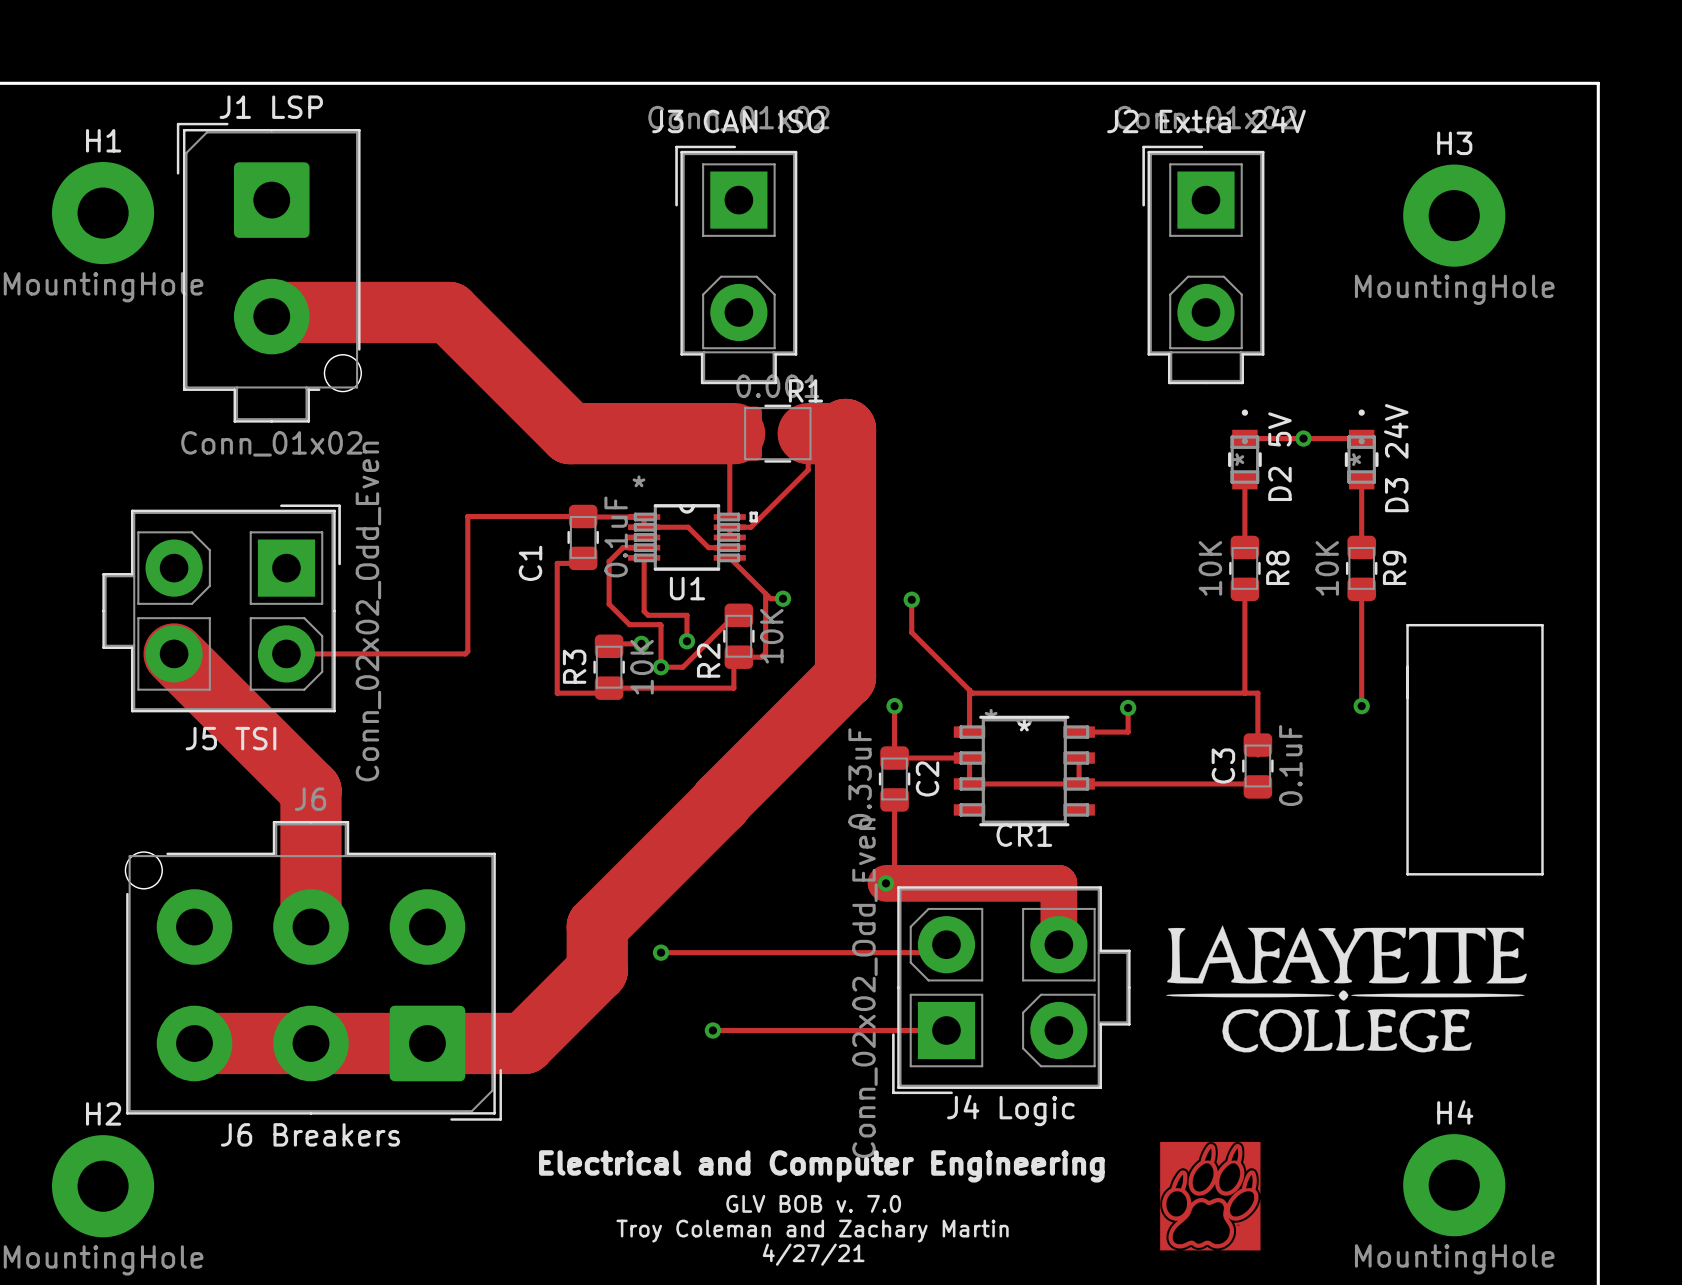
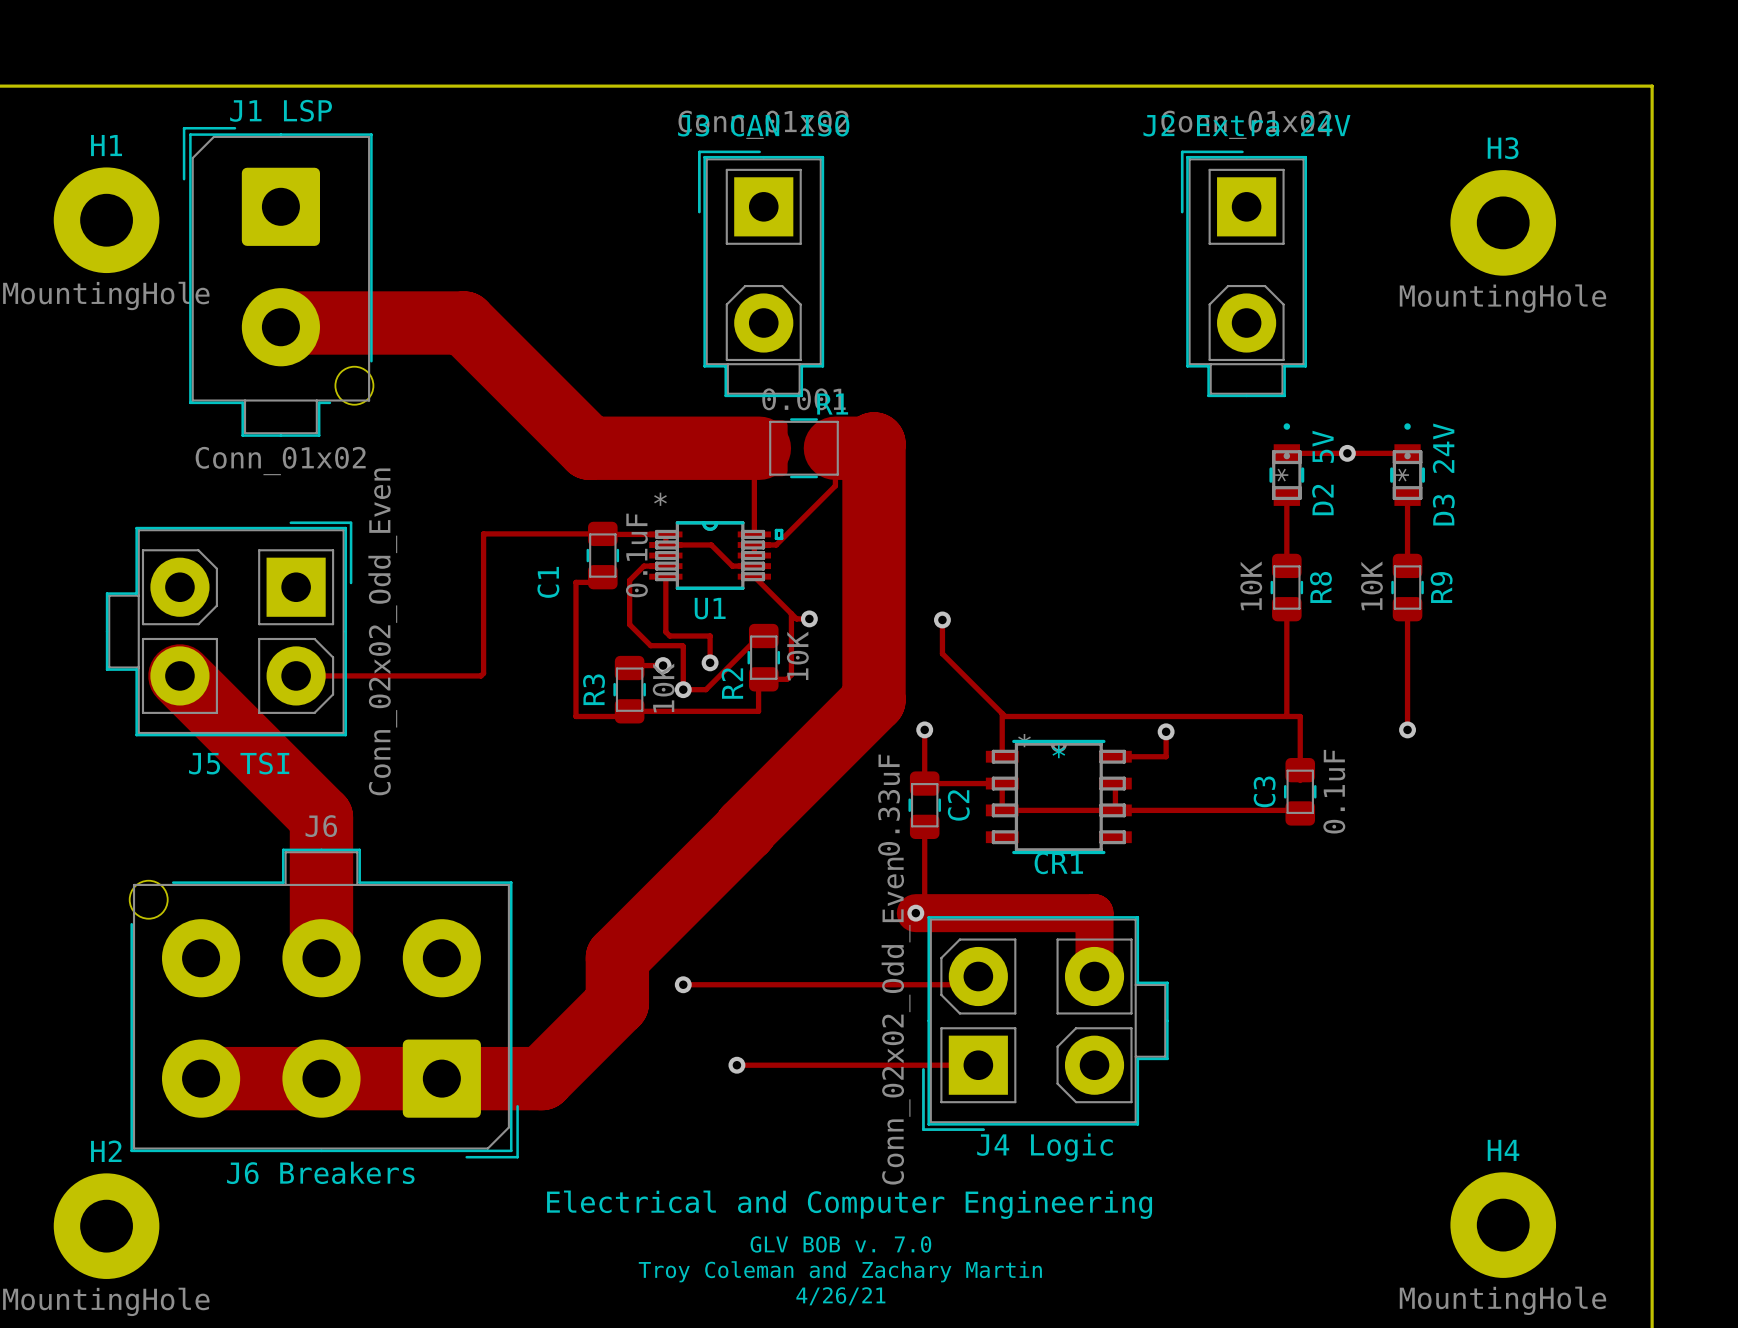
line: (1407, 625) (1407, 874) (1542, 874) (1542, 625) (1407, 625) -> none
drawing: [1166, 925, 1527, 1053] -> none
drawing: [1160, 1141, 1261, 1251] -> none
text: 4/27/21 (813, 1254) -> 4/26/21 (840, 1296)

